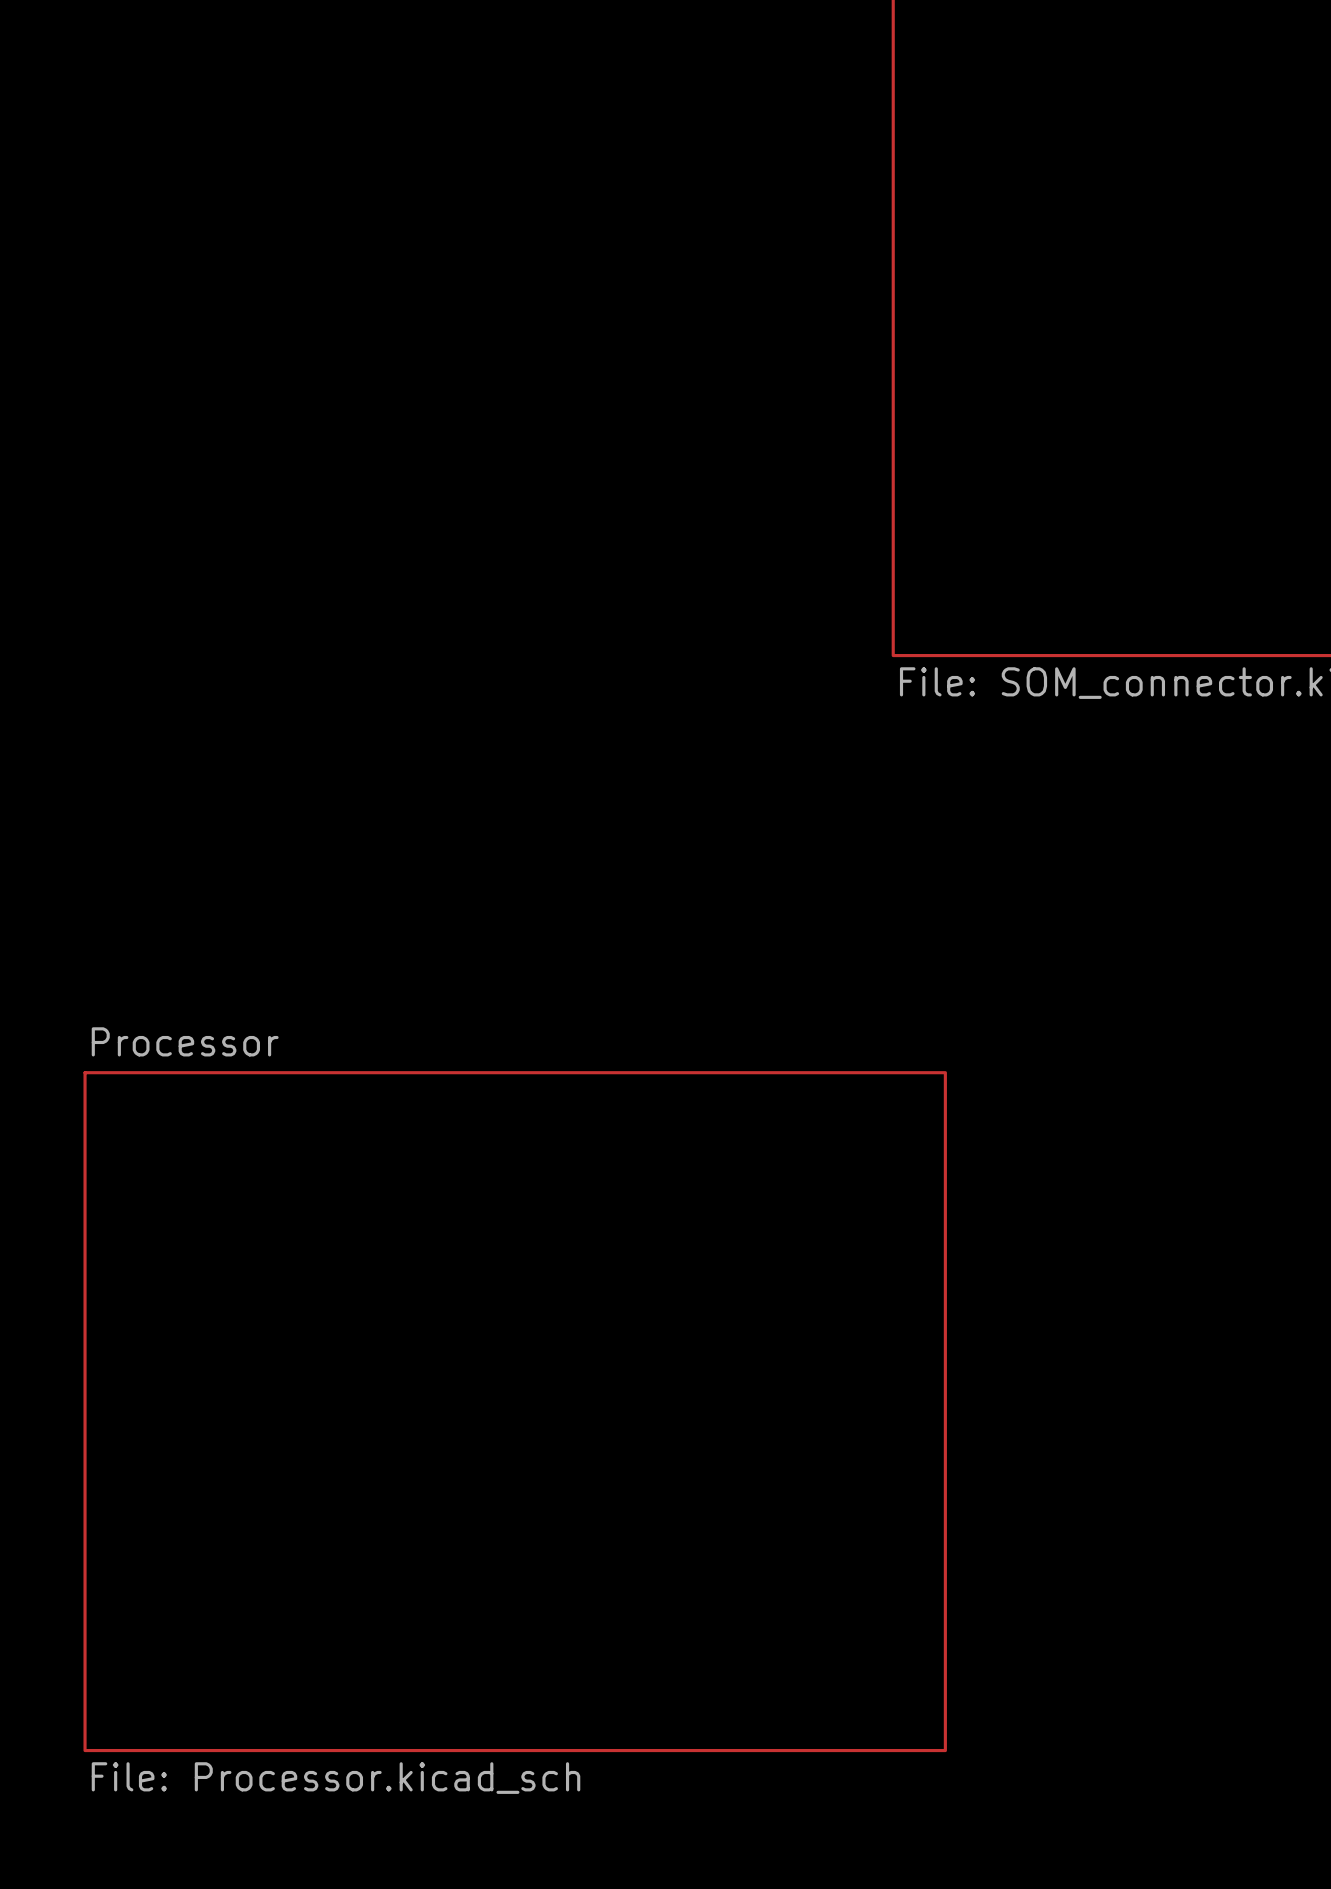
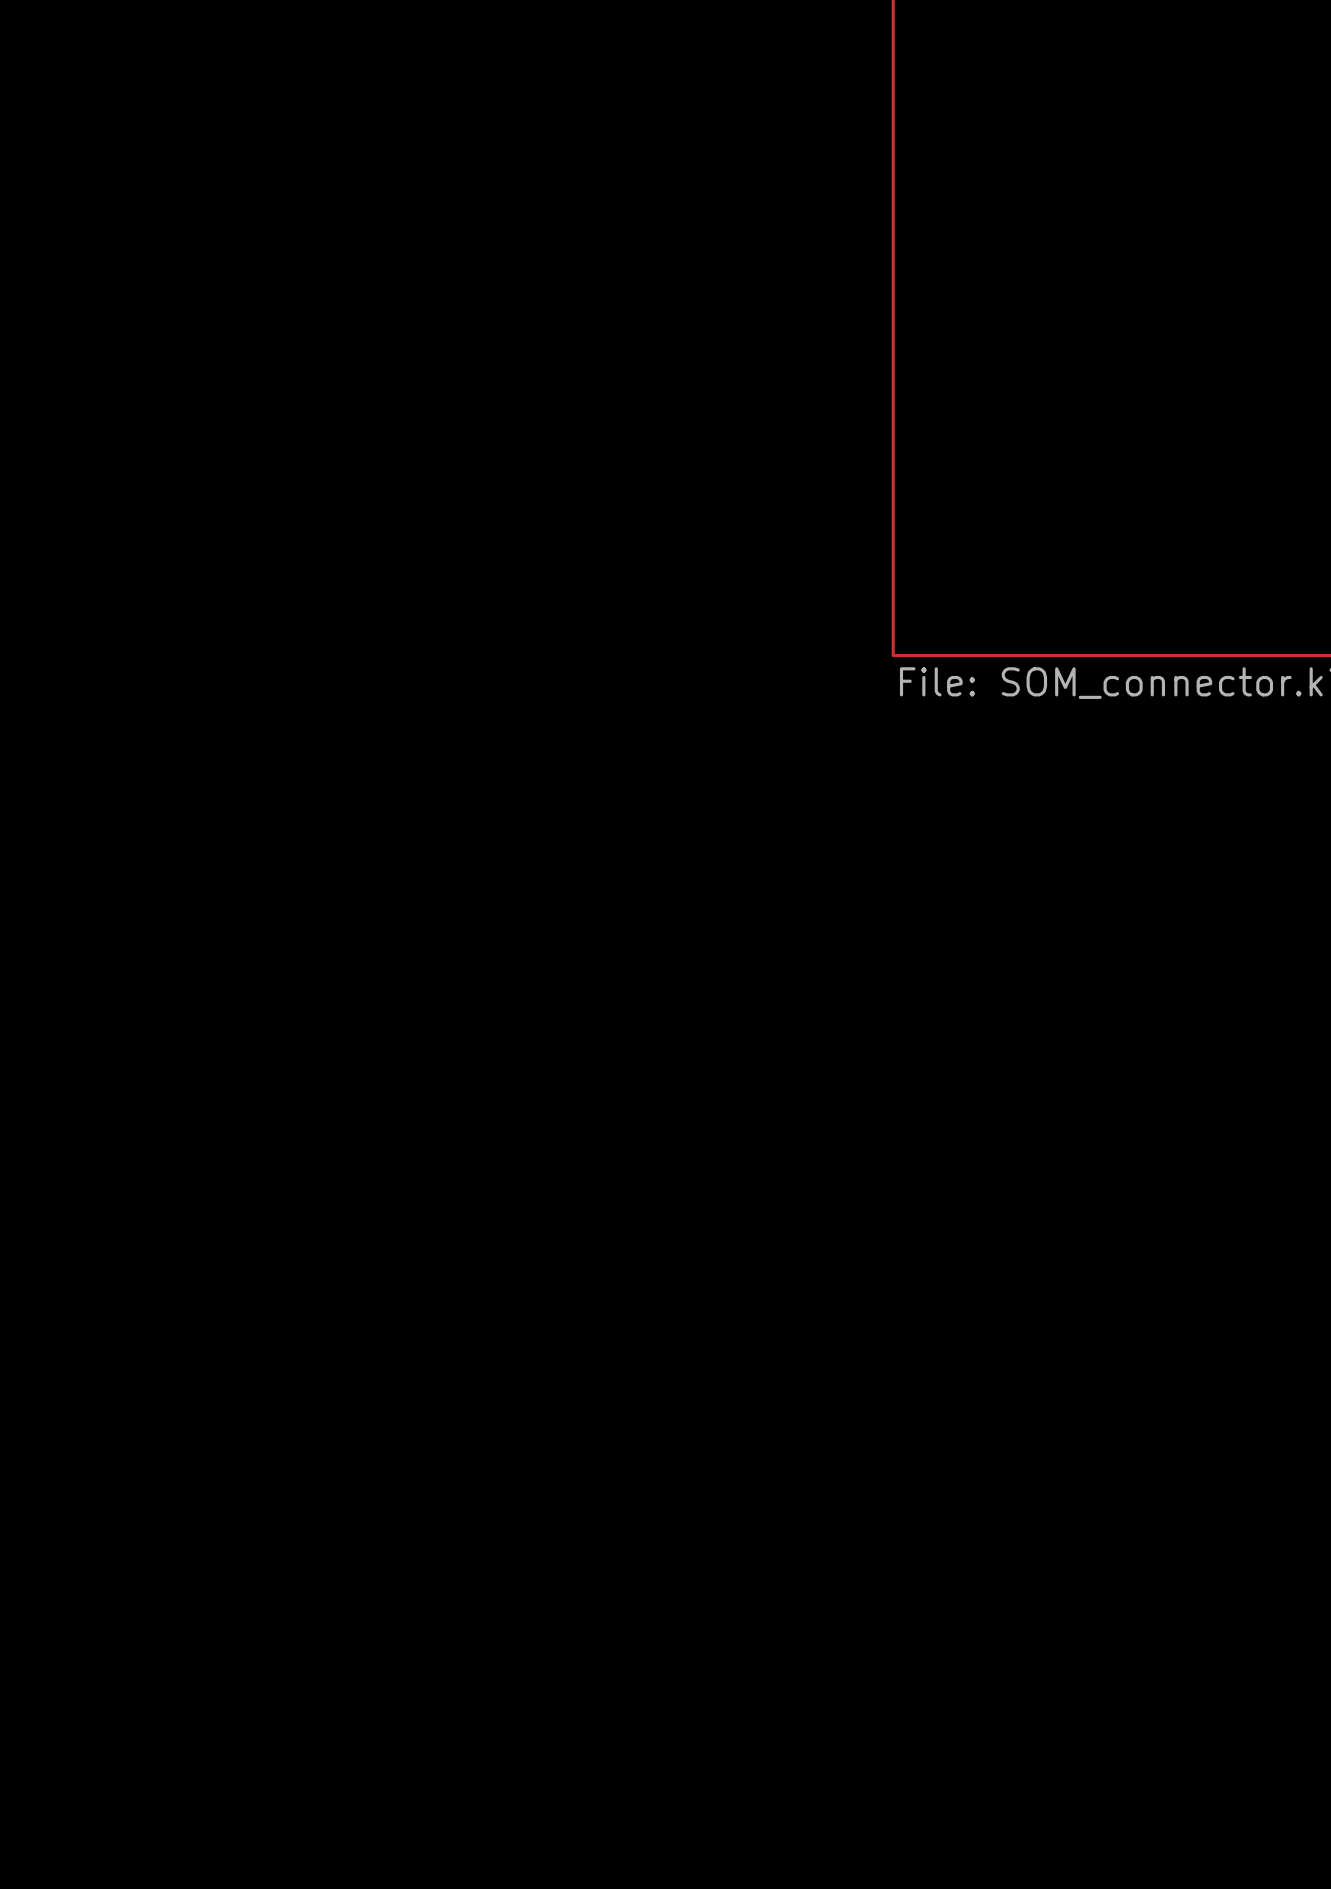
sheet Processor: File: Processor.kicad_sch (515, 1411) -> none

